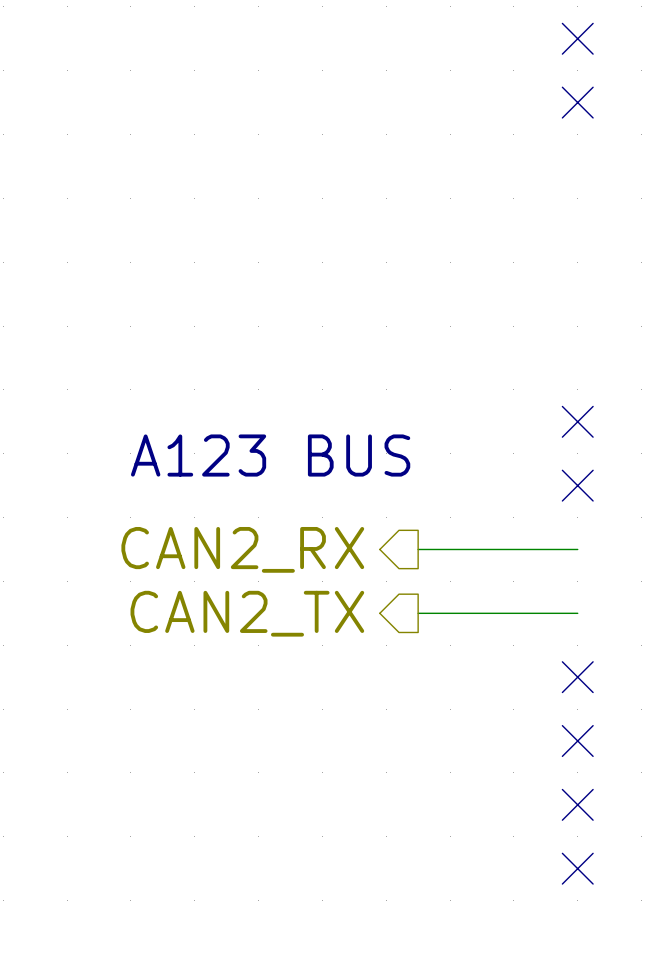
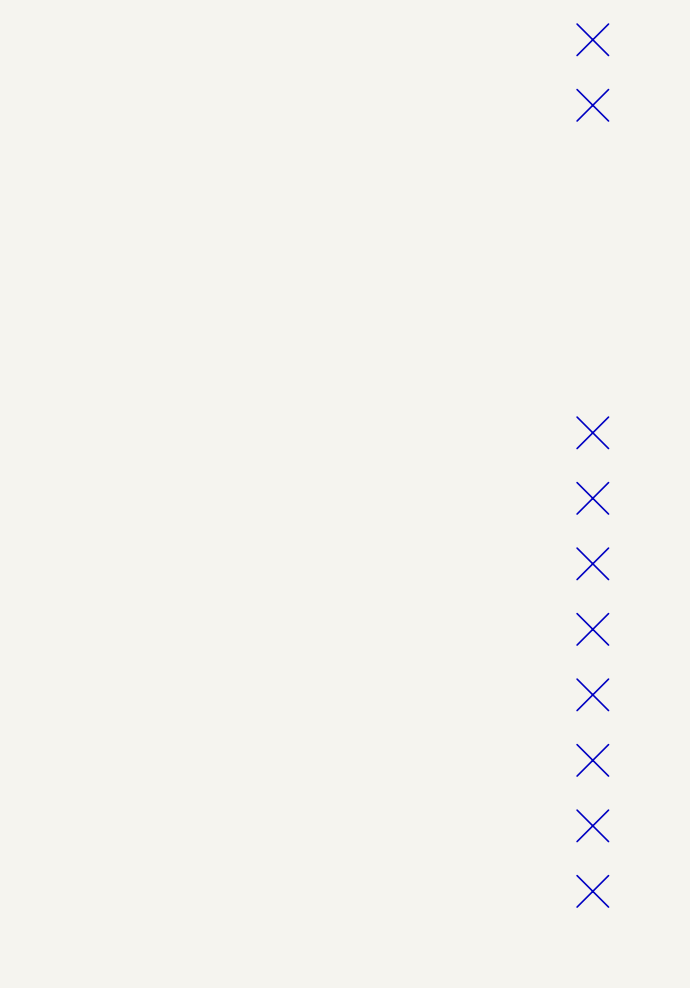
text: A123 BUS (270, 455) -> none
hierarchical label: CAN2_RX (242, 549) -> none
wire: (418, 549) (577, 549) -> none
no-connect mark: none -> (592, 563)
hierarchical label: CAN2_TX (247, 613) -> none
wire: (418, 613) (577, 613) -> none
no-connect mark: none -> (592, 629)

